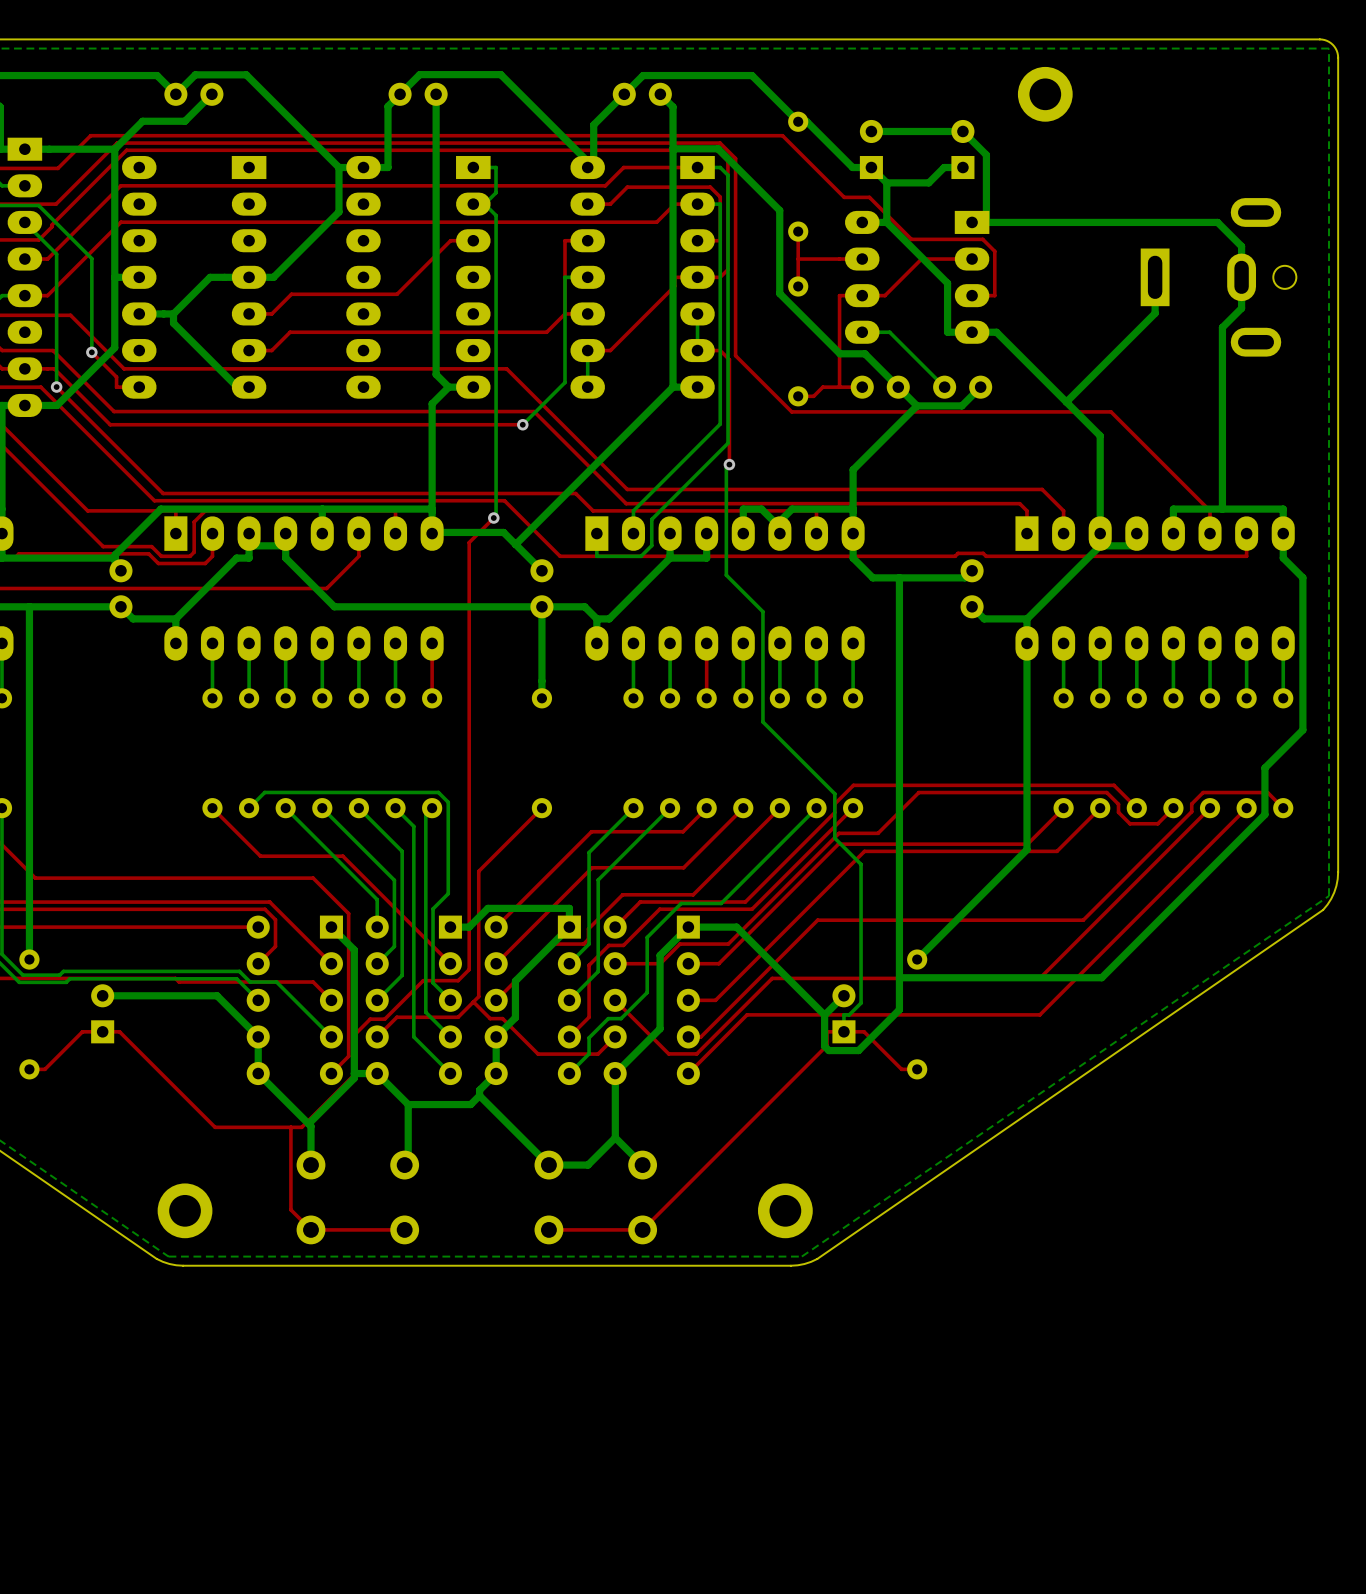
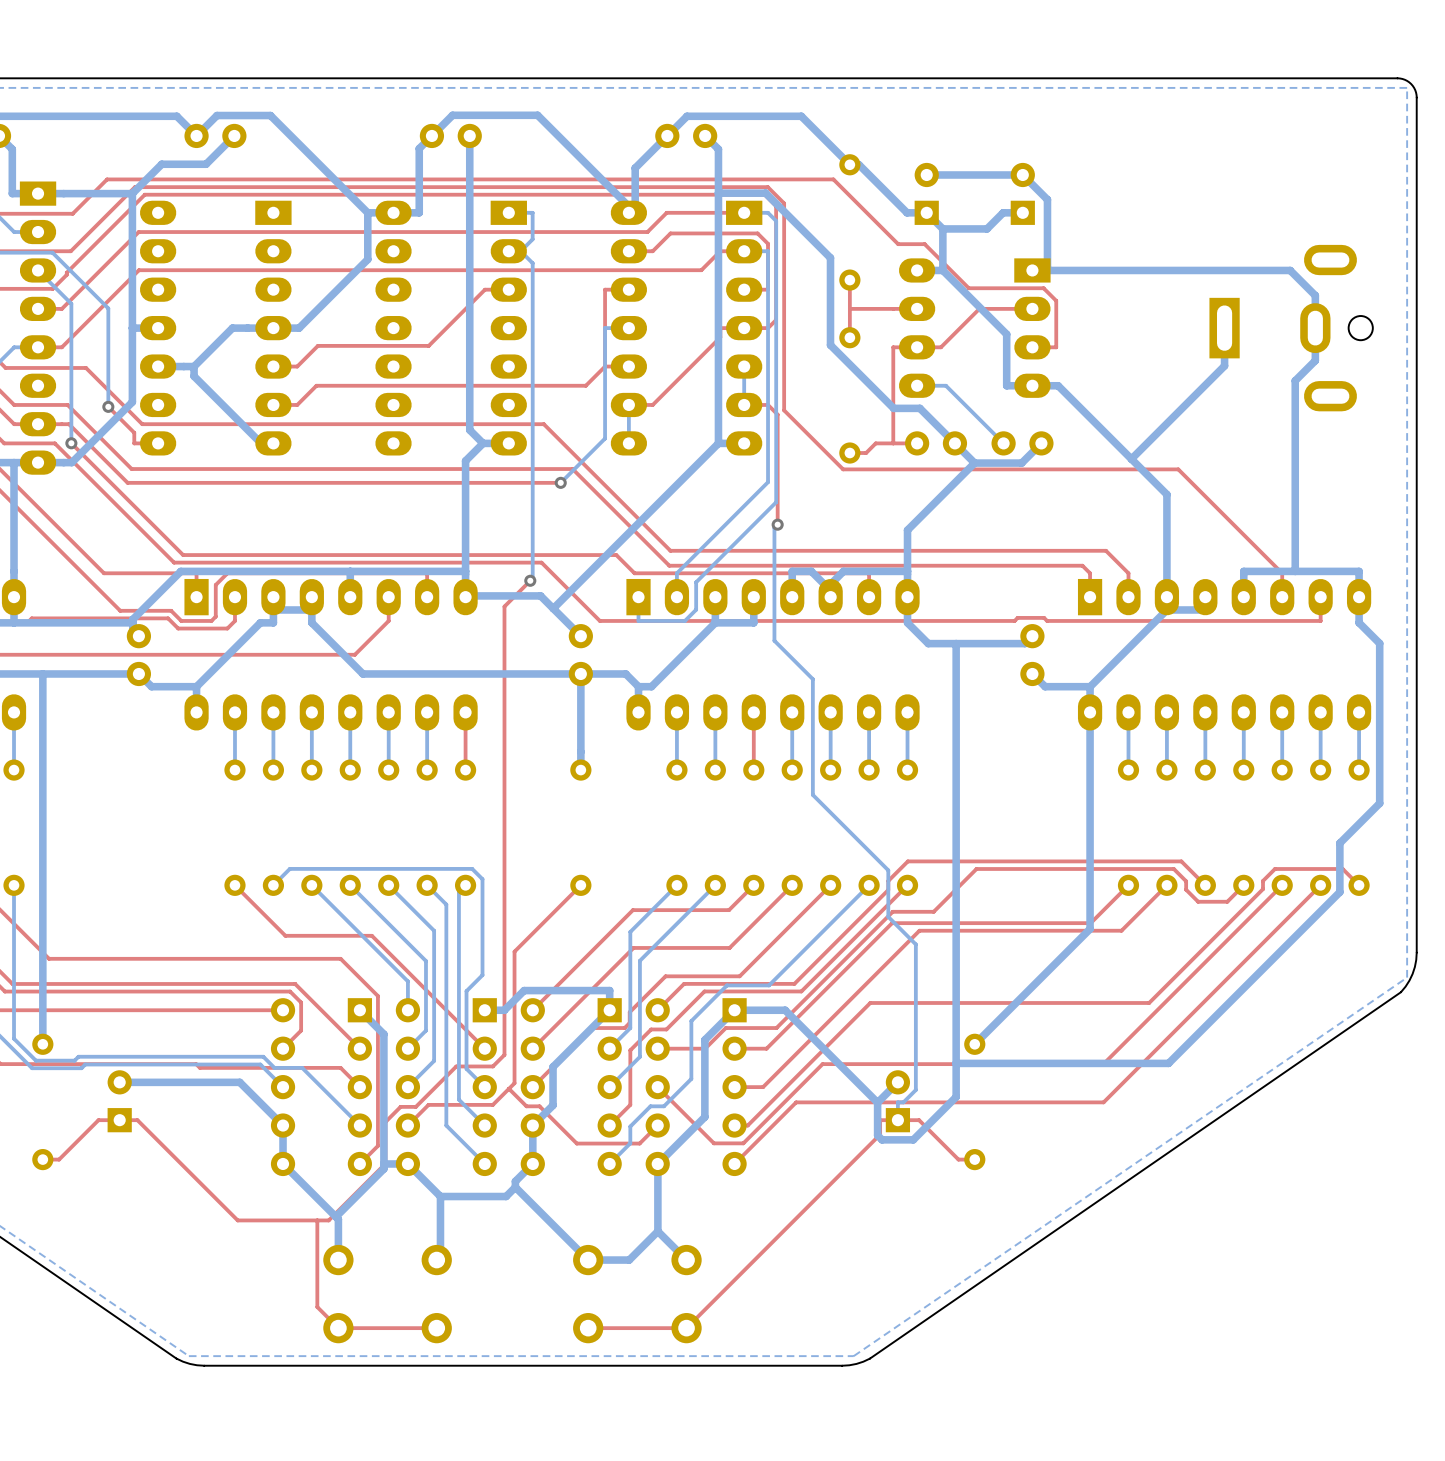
part: (1045, 94) -> none
part: (185, 1210) -> none
part: (785, 1210) -> none

